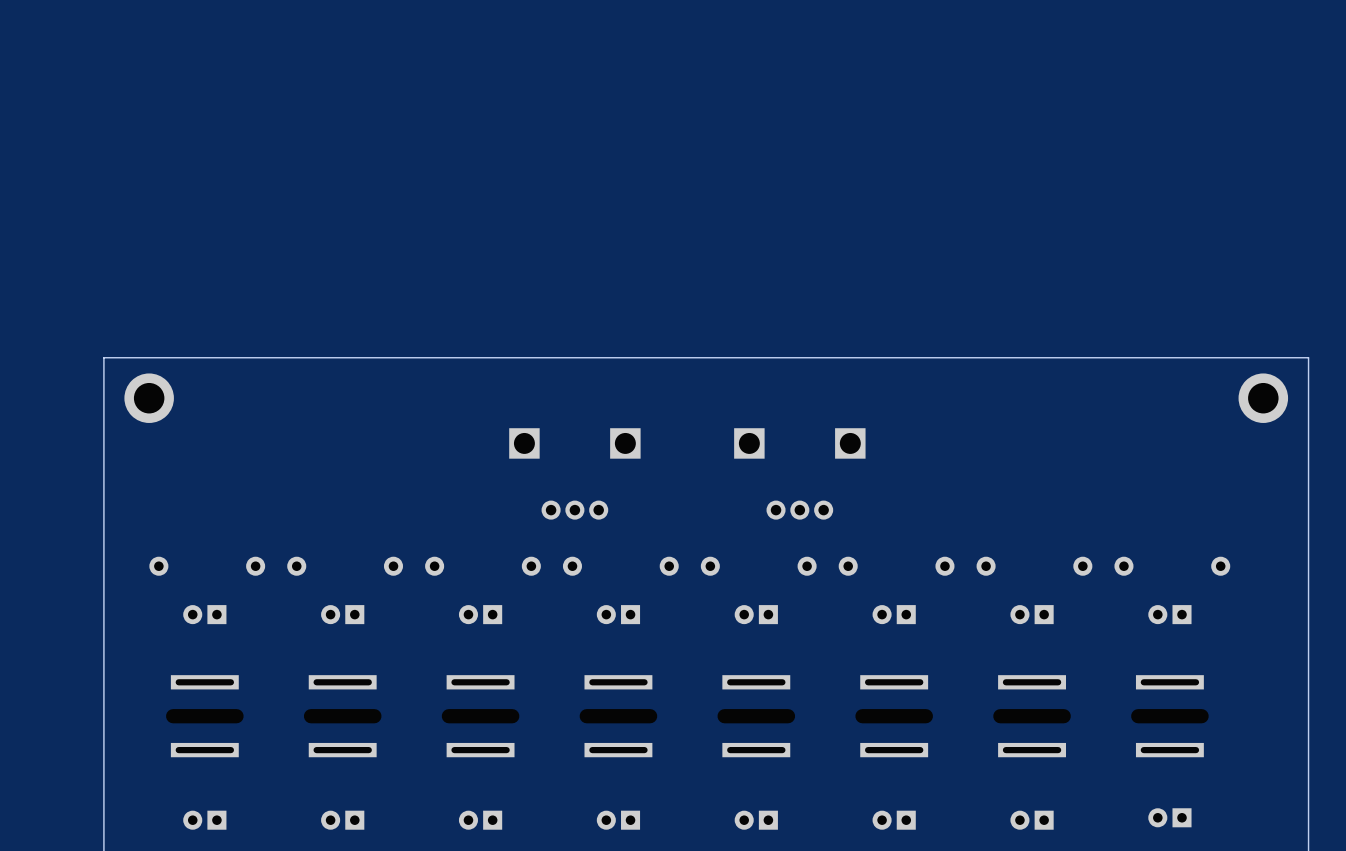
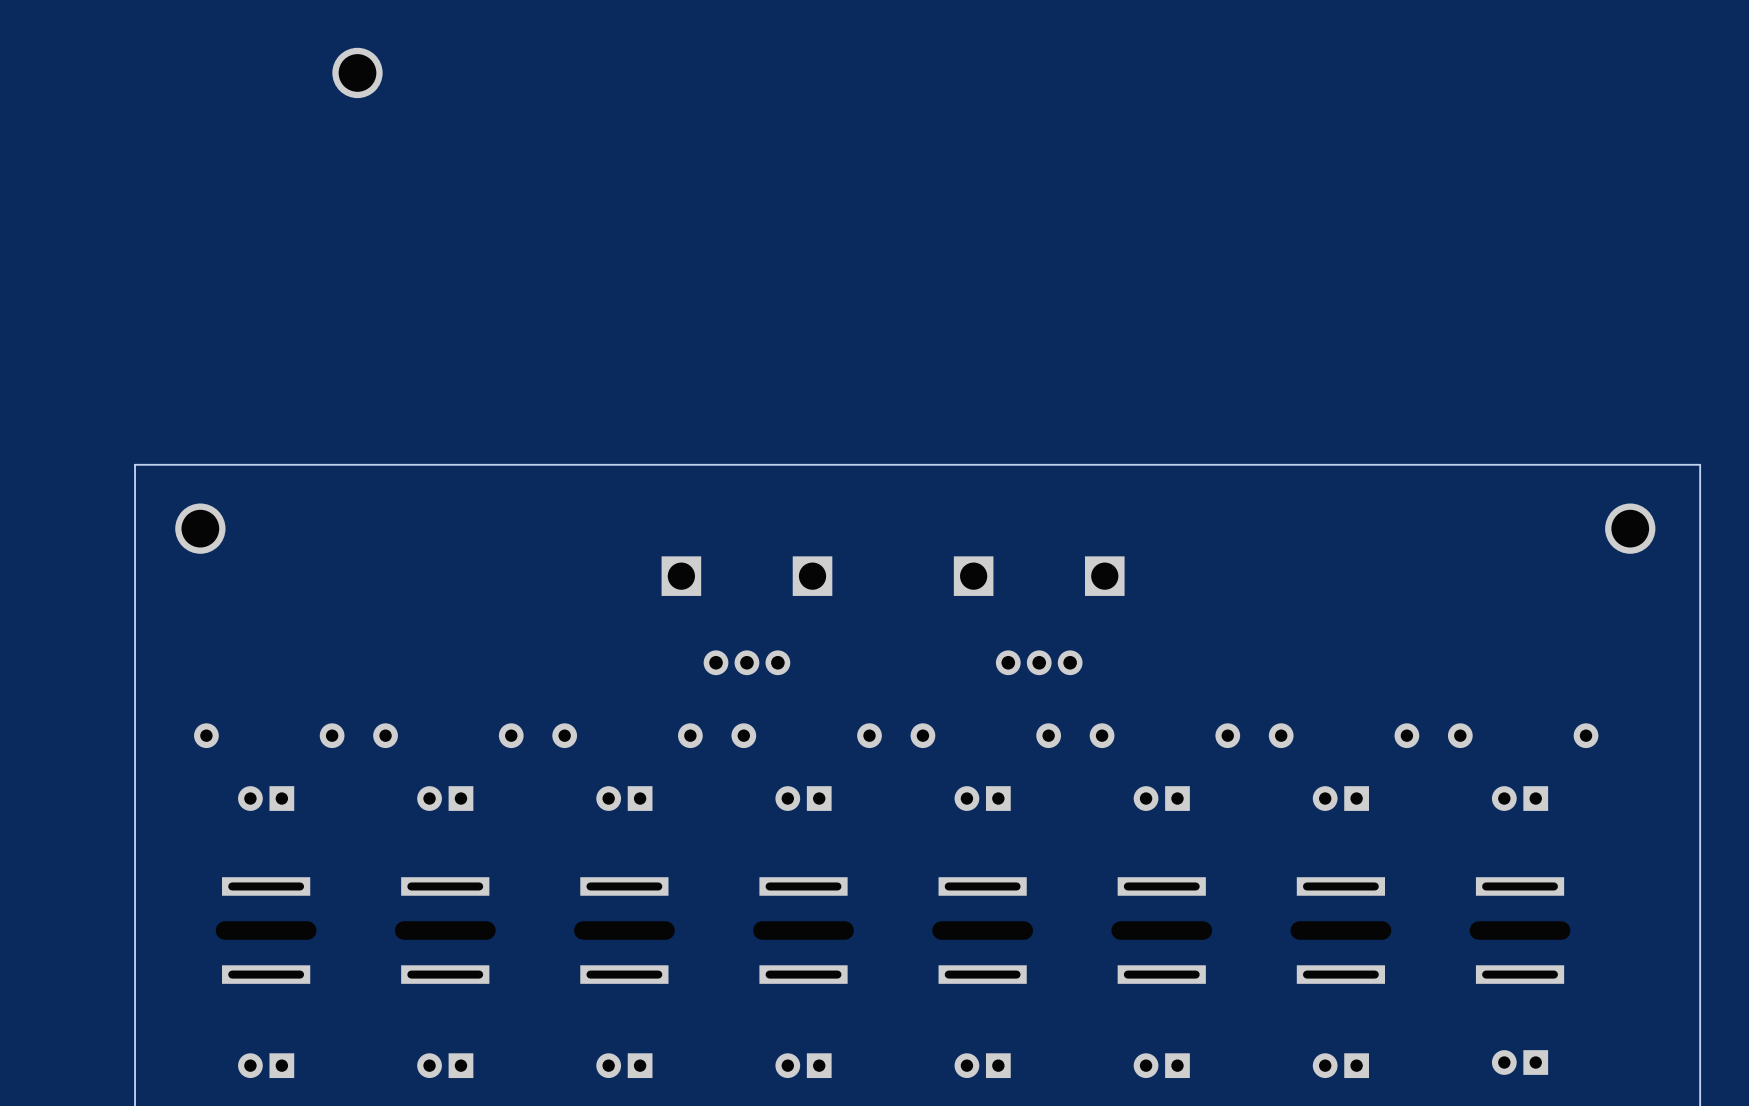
part: none -> (357, 72)
part: (149, 398) -> none
part: (1263, 398) -> none
part: none -> (200, 528)
part: none -> (1630, 528)

